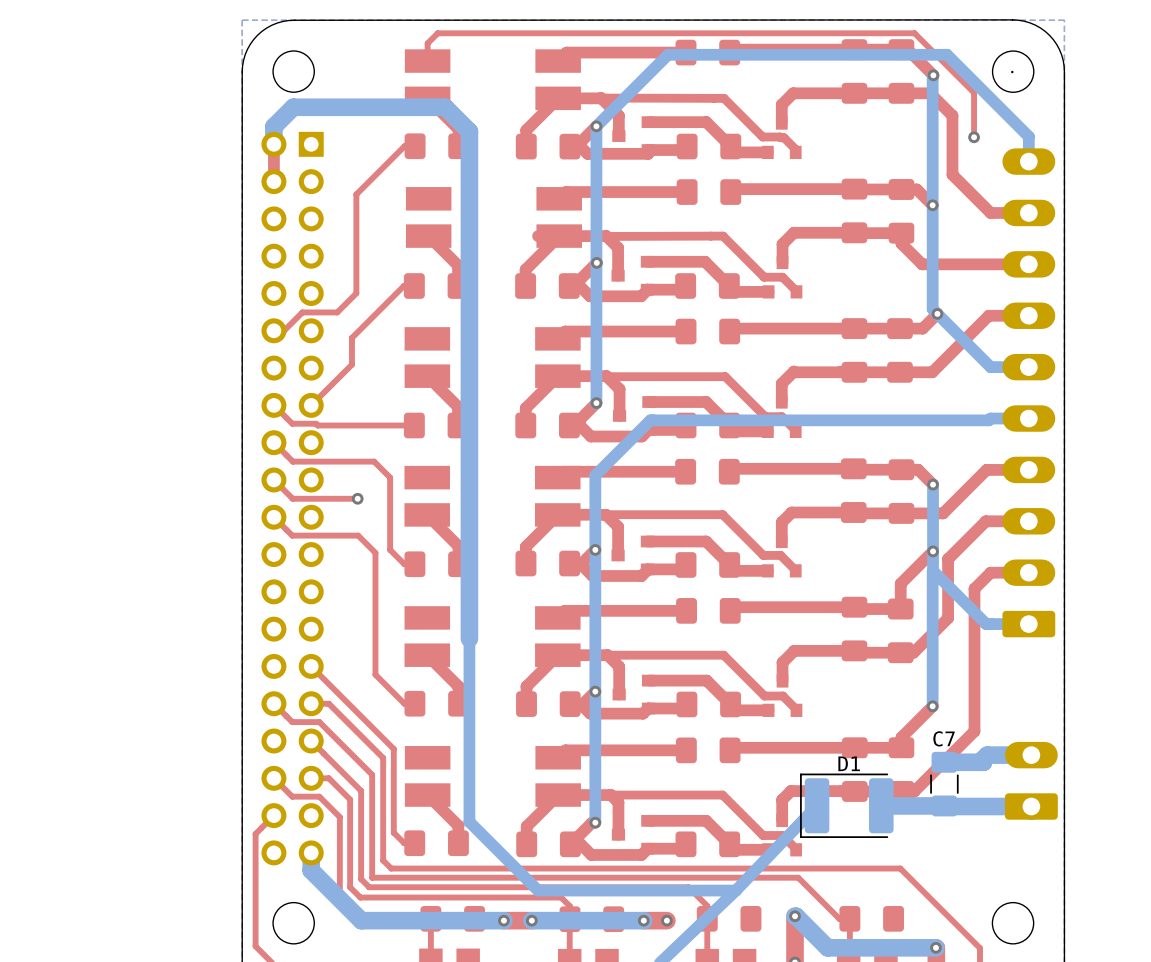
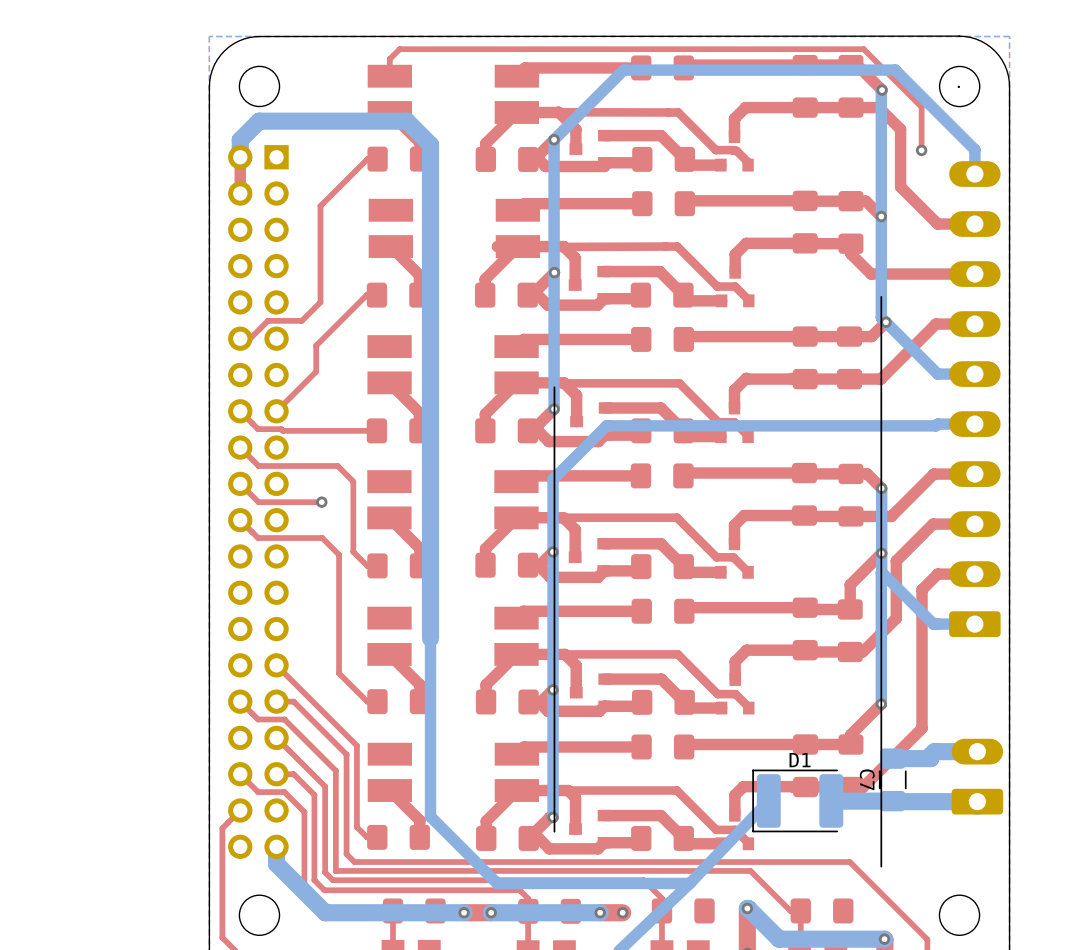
line: none -> (881, 296) (881, 866)
line: none -> (554, 387) (554, 831)
C7 name rotation: 0° (944, 738) -> 90° clockwise (867, 779)
C7 name position: C7 (944, 738) -> C7 (867, 779)

